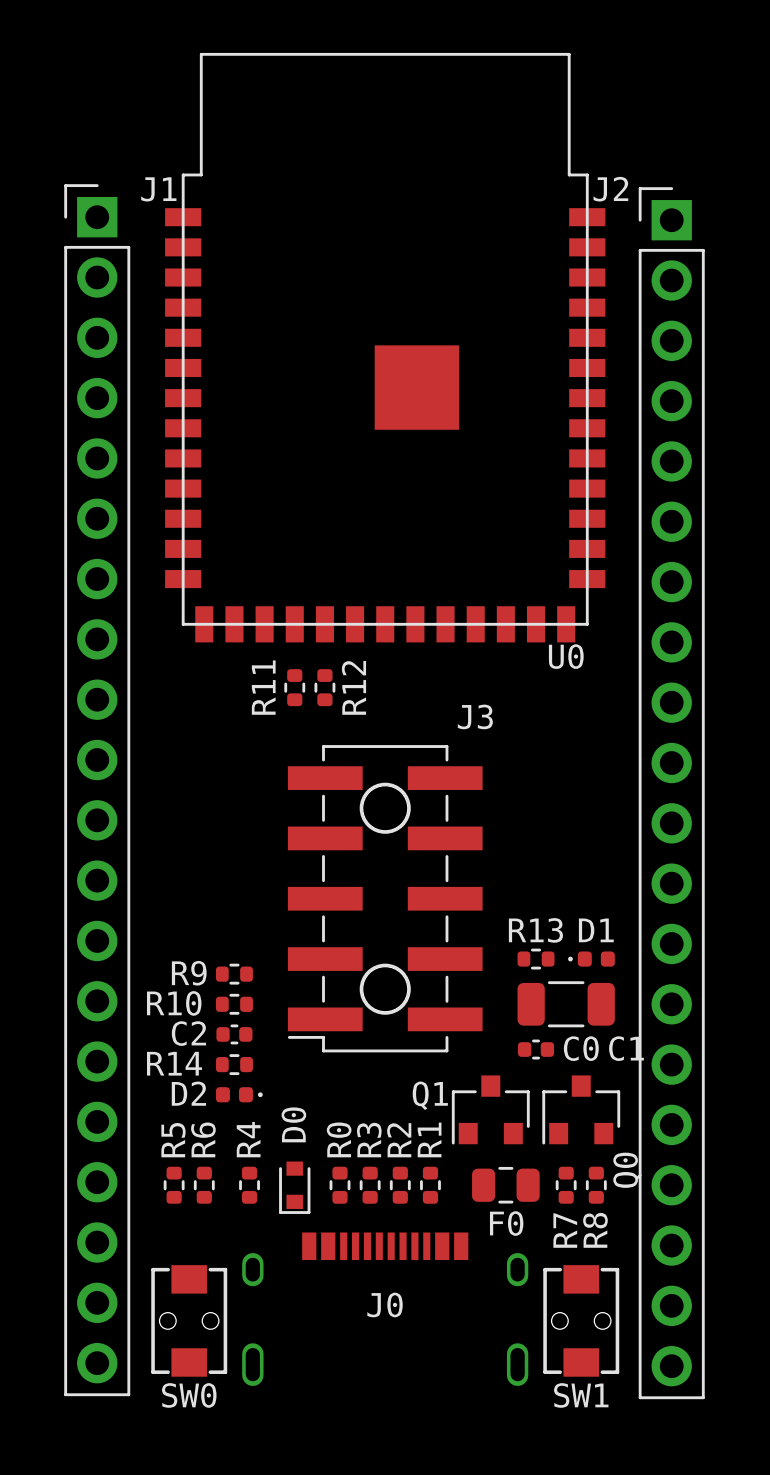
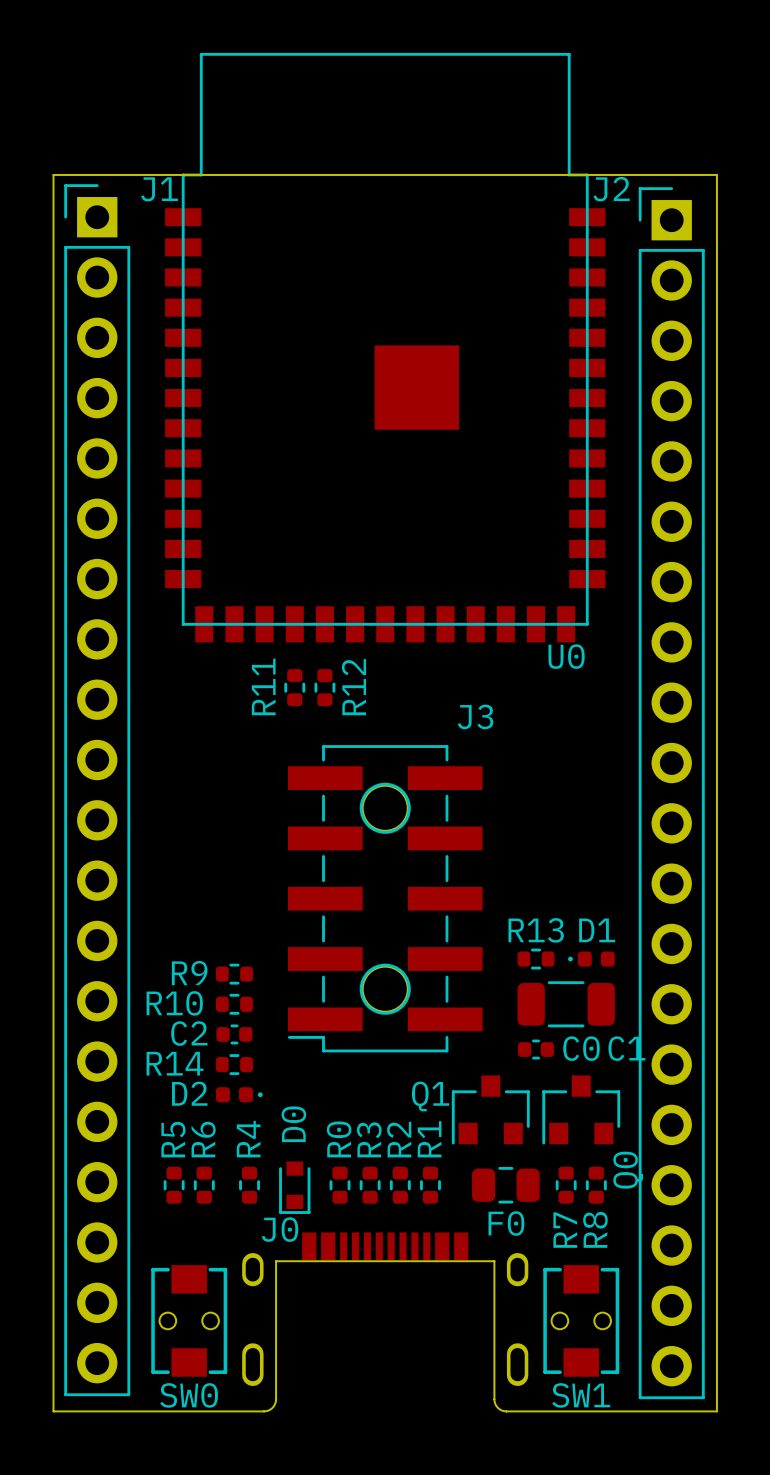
board edge: none -> (53, 174) (53, 1411) (264, 1411) (271, 1408) (276, 1399) (276, 1261) (494, 1261) (494, 1399) (499, 1408) (506, 1411) (716, 1411) (716, 174) (53, 174)
J0 name position: J0 (385, 1304) -> J0 (279, 1229)

